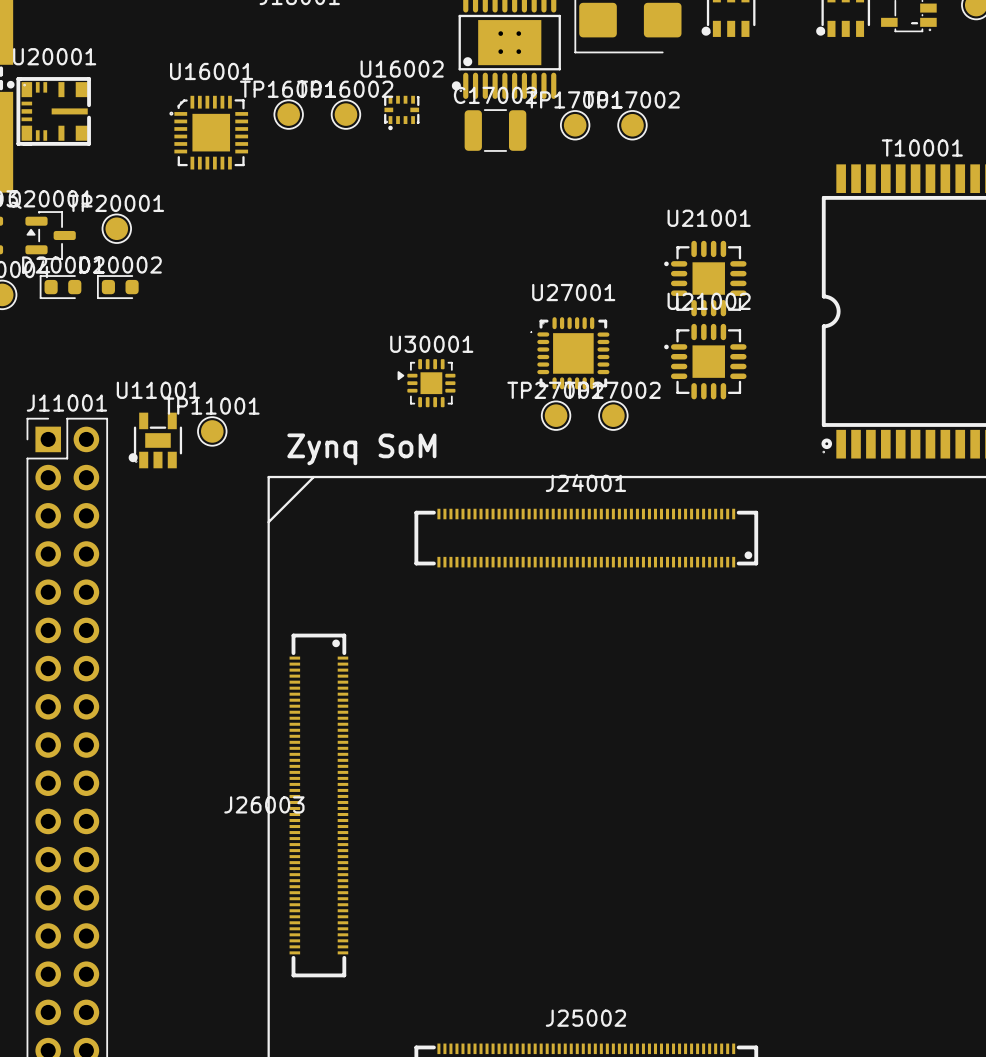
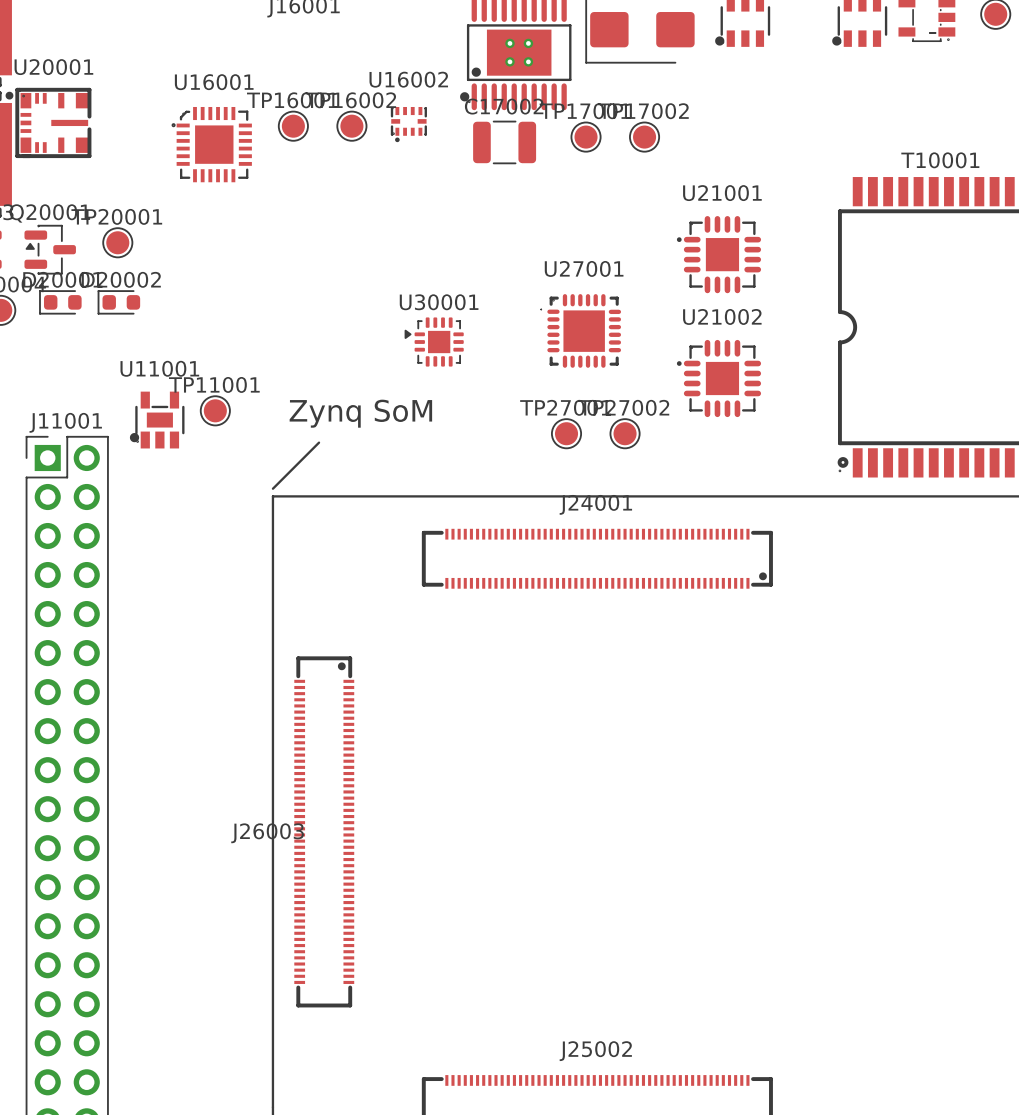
U21001 position: (705, 278) -> (718, 254)
U27001 position: (570, 353) -> (581, 330)
U30001 position: (426, 383) -> (434, 342)
TP11001 position: (212, 431) -> (215, 410)
U11001 position: (155, 440) -> (157, 420)
text position: Zynq SoM (361, 449) -> Zynq SoM (360, 413)
line: (313, 477) (268, 522) -> (319, 442) (272, 488)

